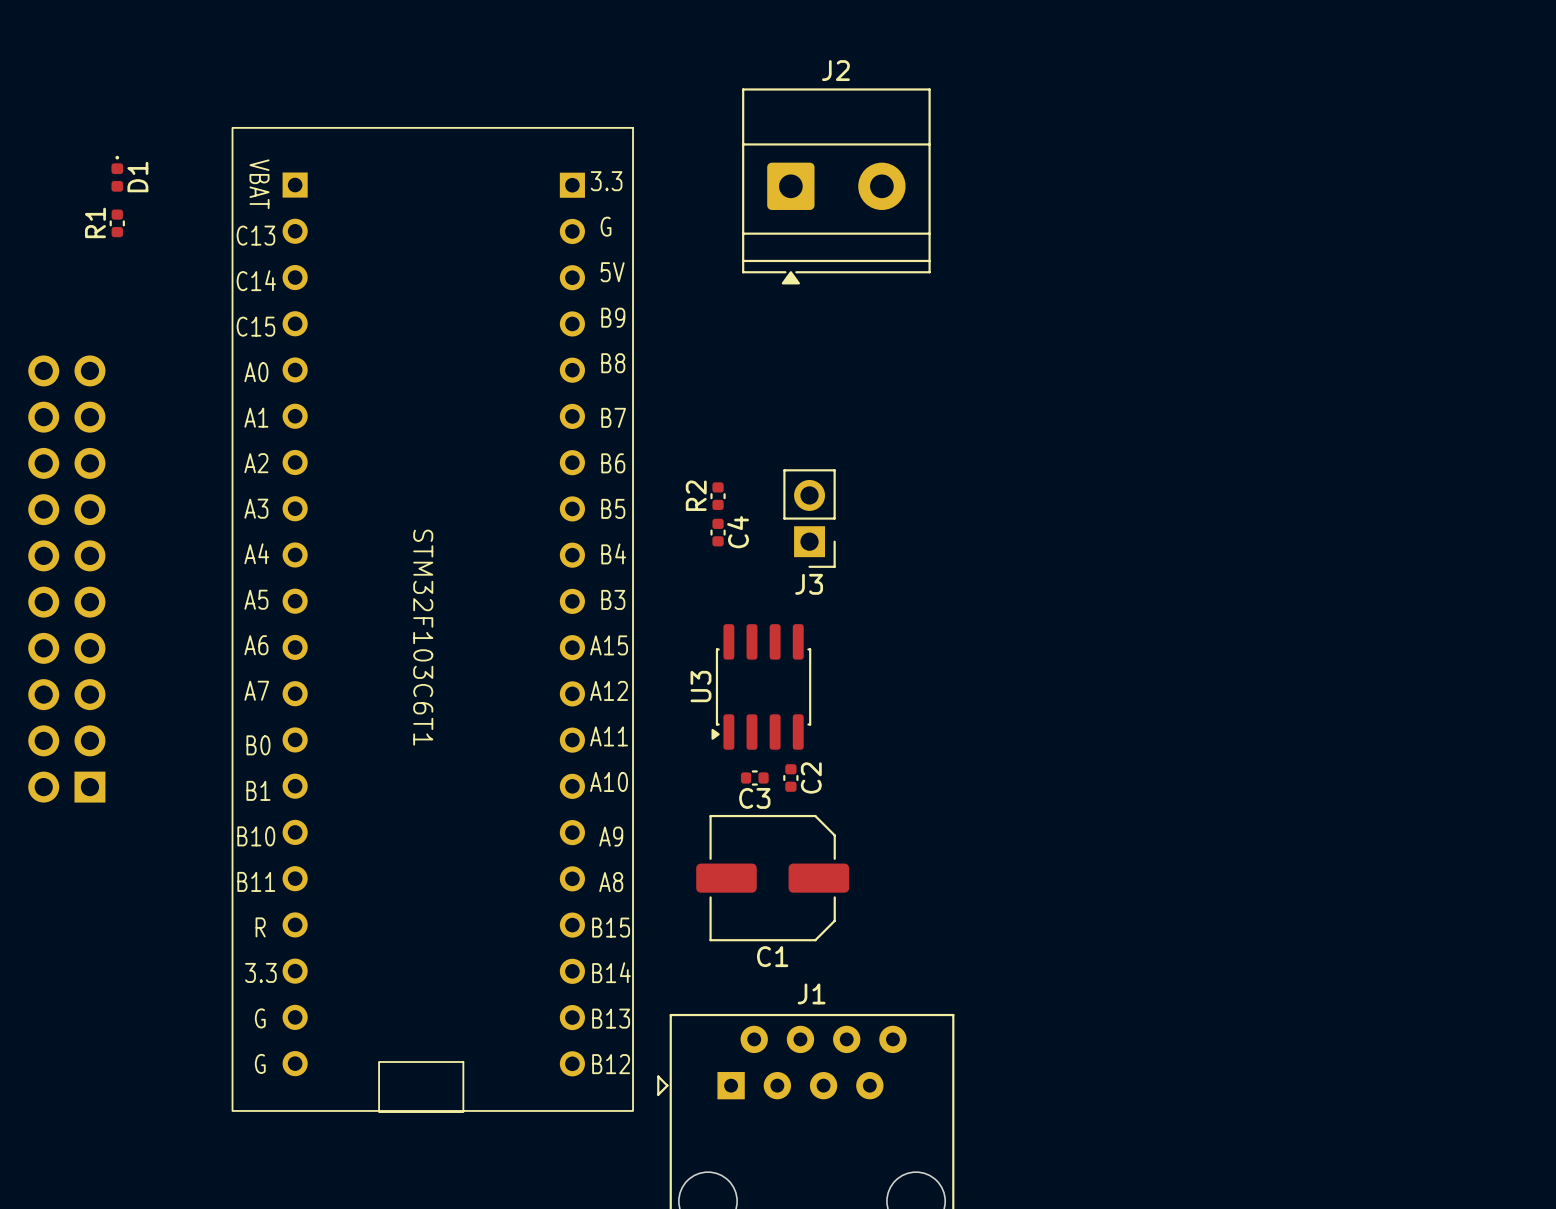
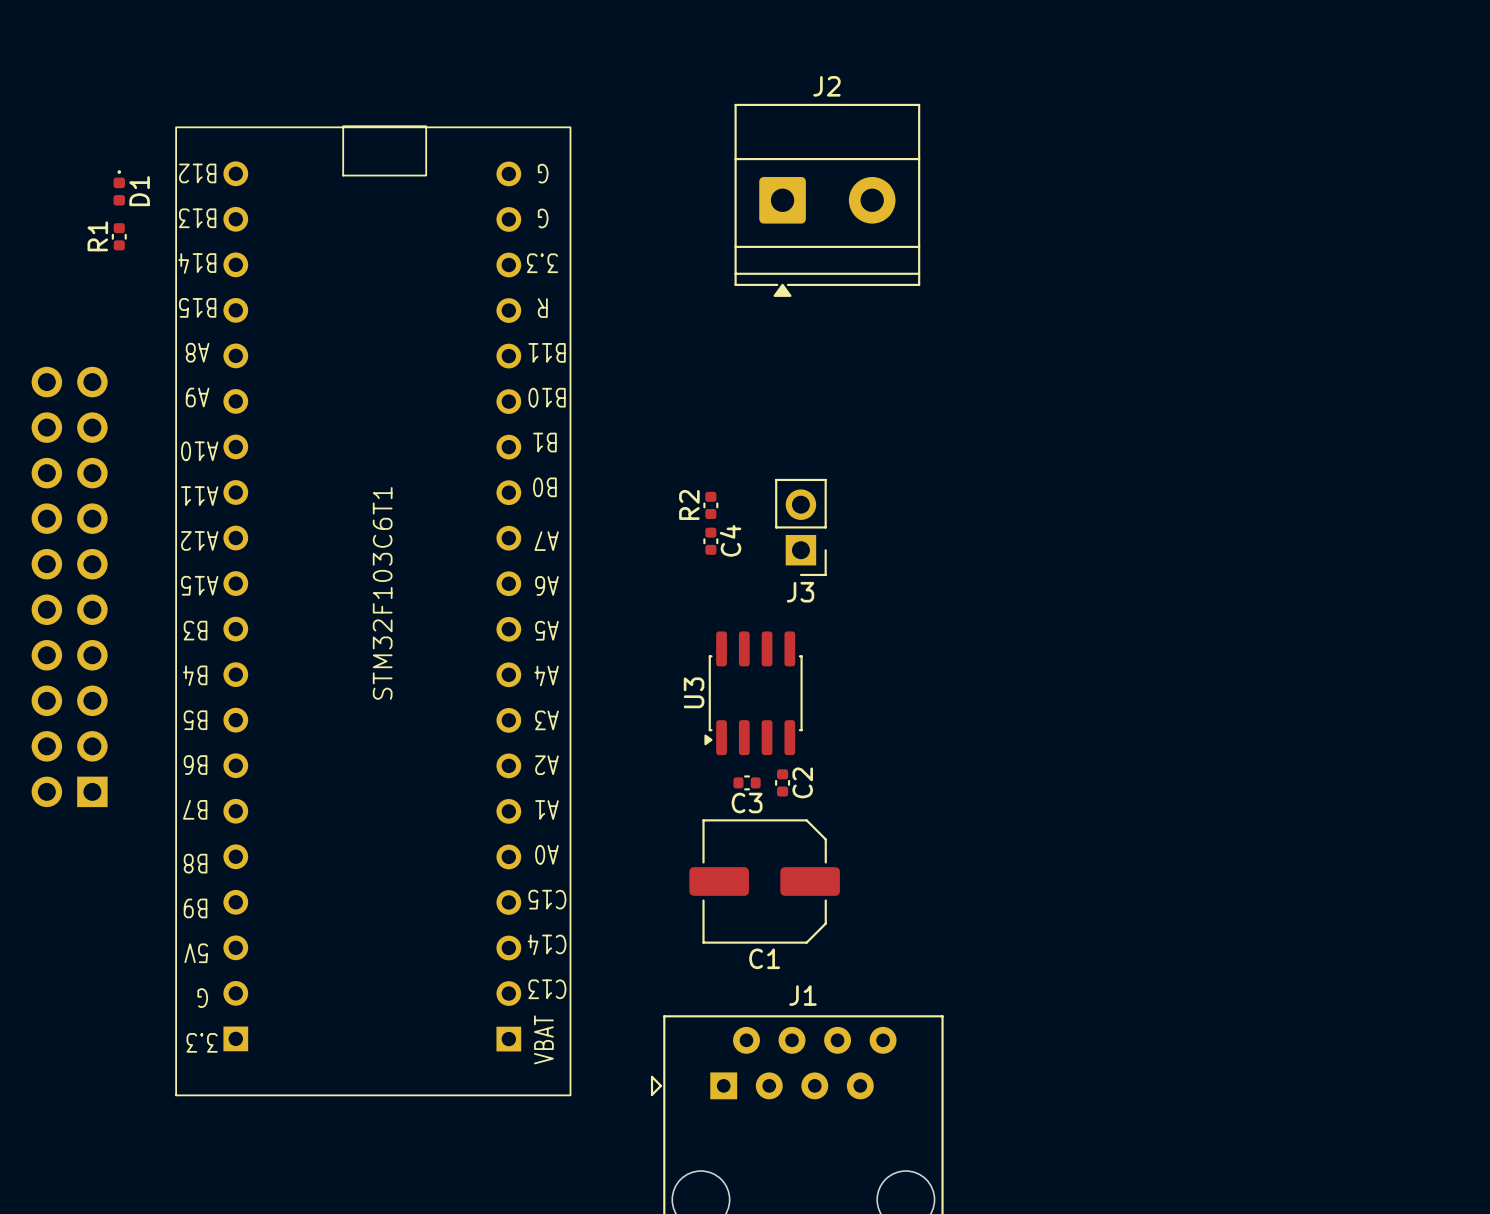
STM32F103C6T1 rotation: 0° (432, 619) -> 180° (373, 610)

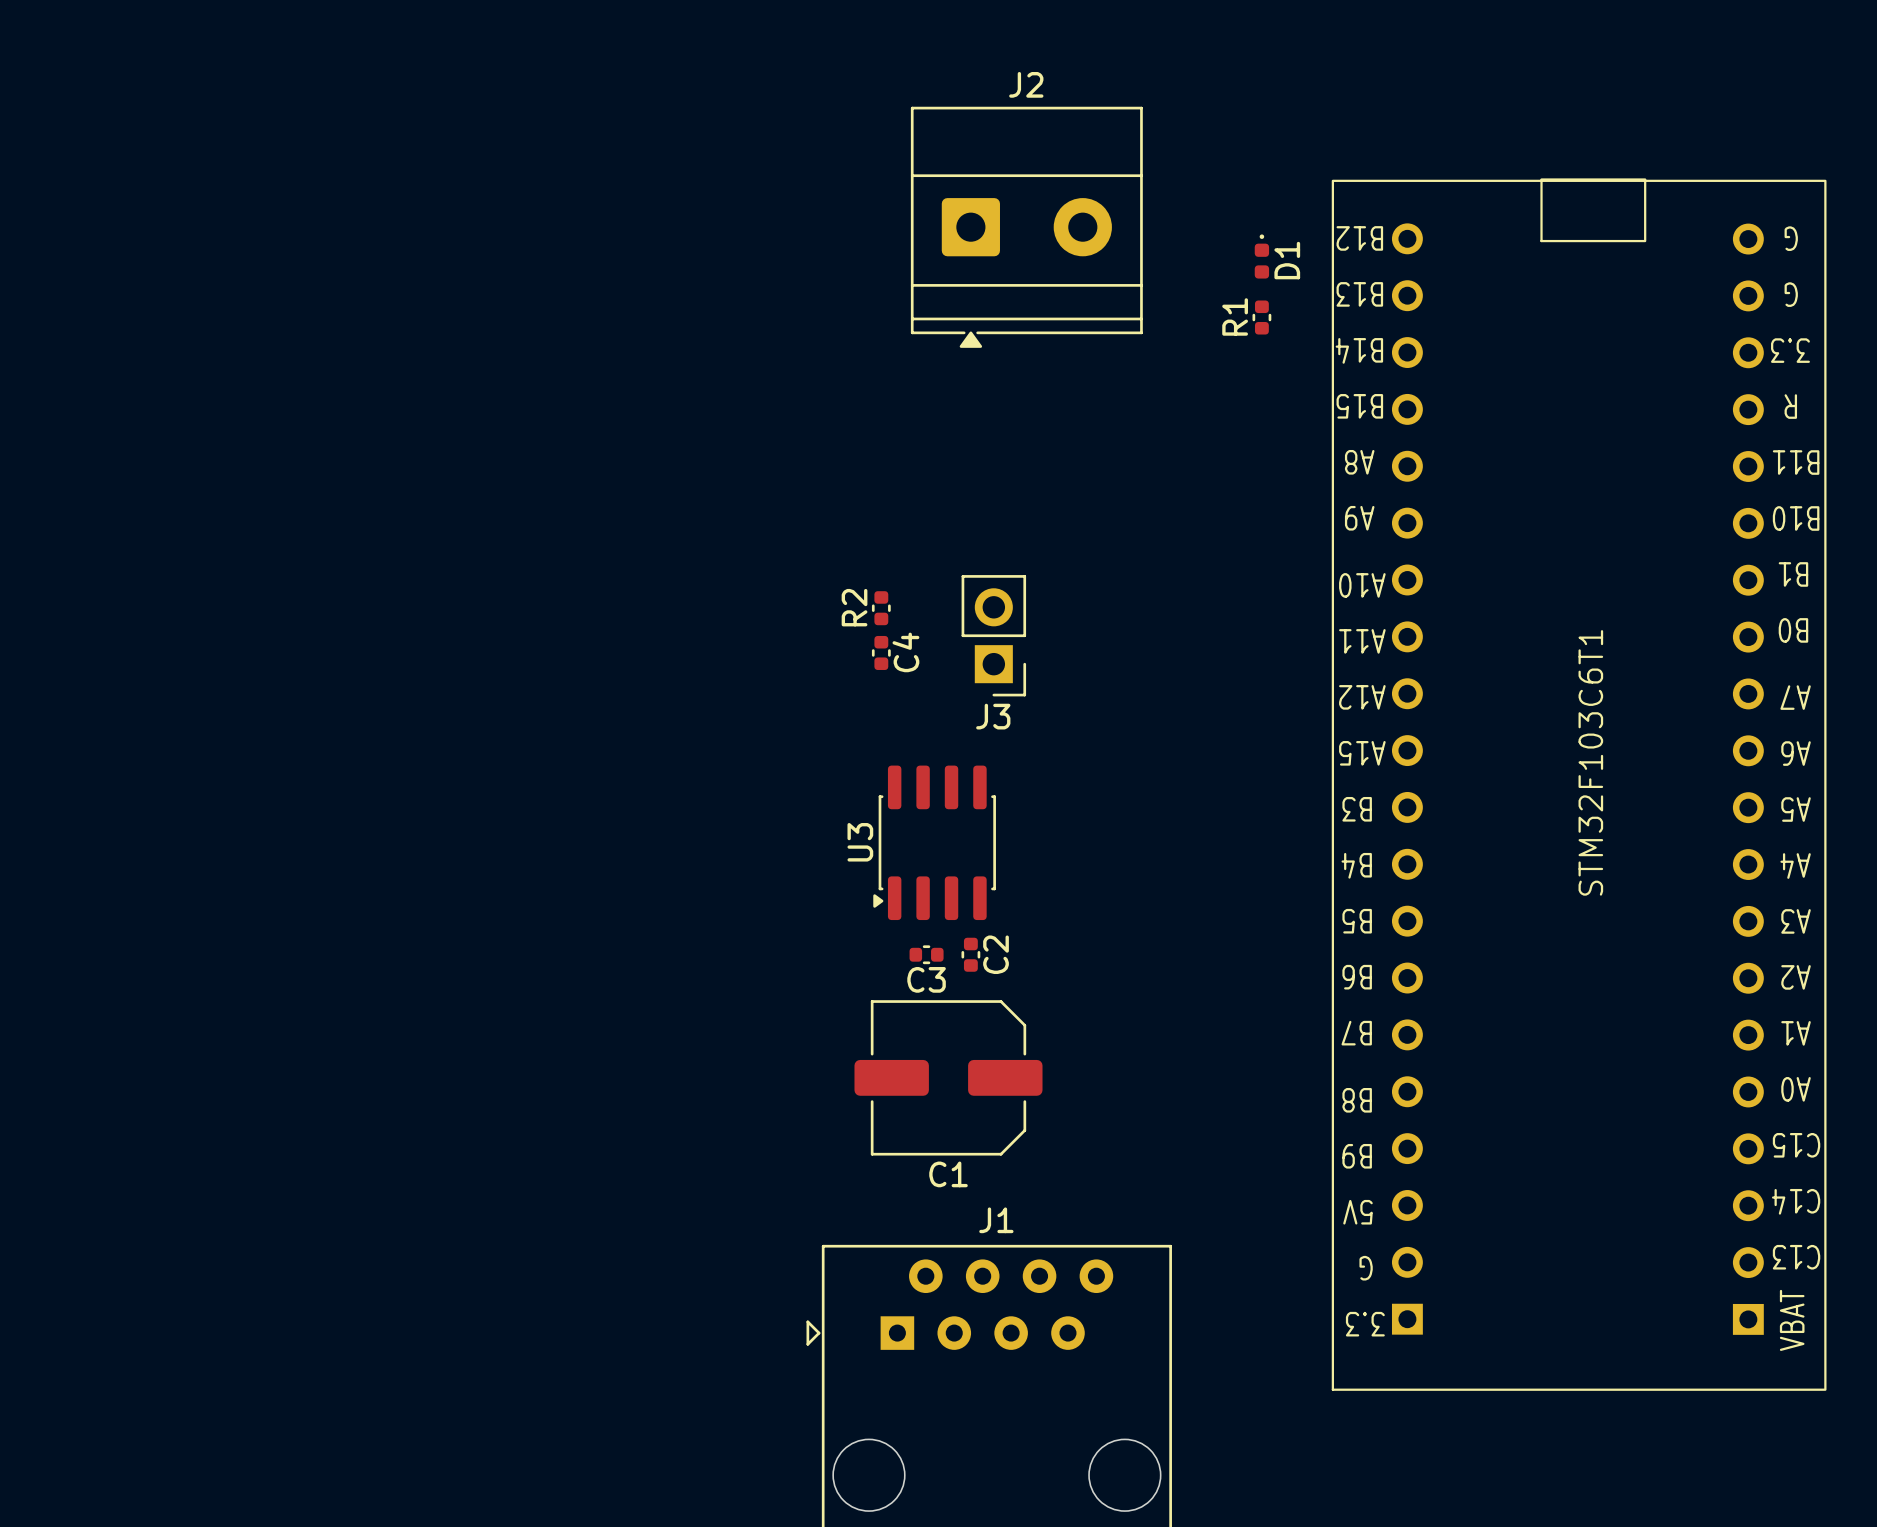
D1 position: (119, 187) -> (1261, 256)
R1 position: (119, 236) -> (1261, 317)
part: (69, 586) -> none
STM32F103C6T1 position: (373, 610) -> (1579, 784)

